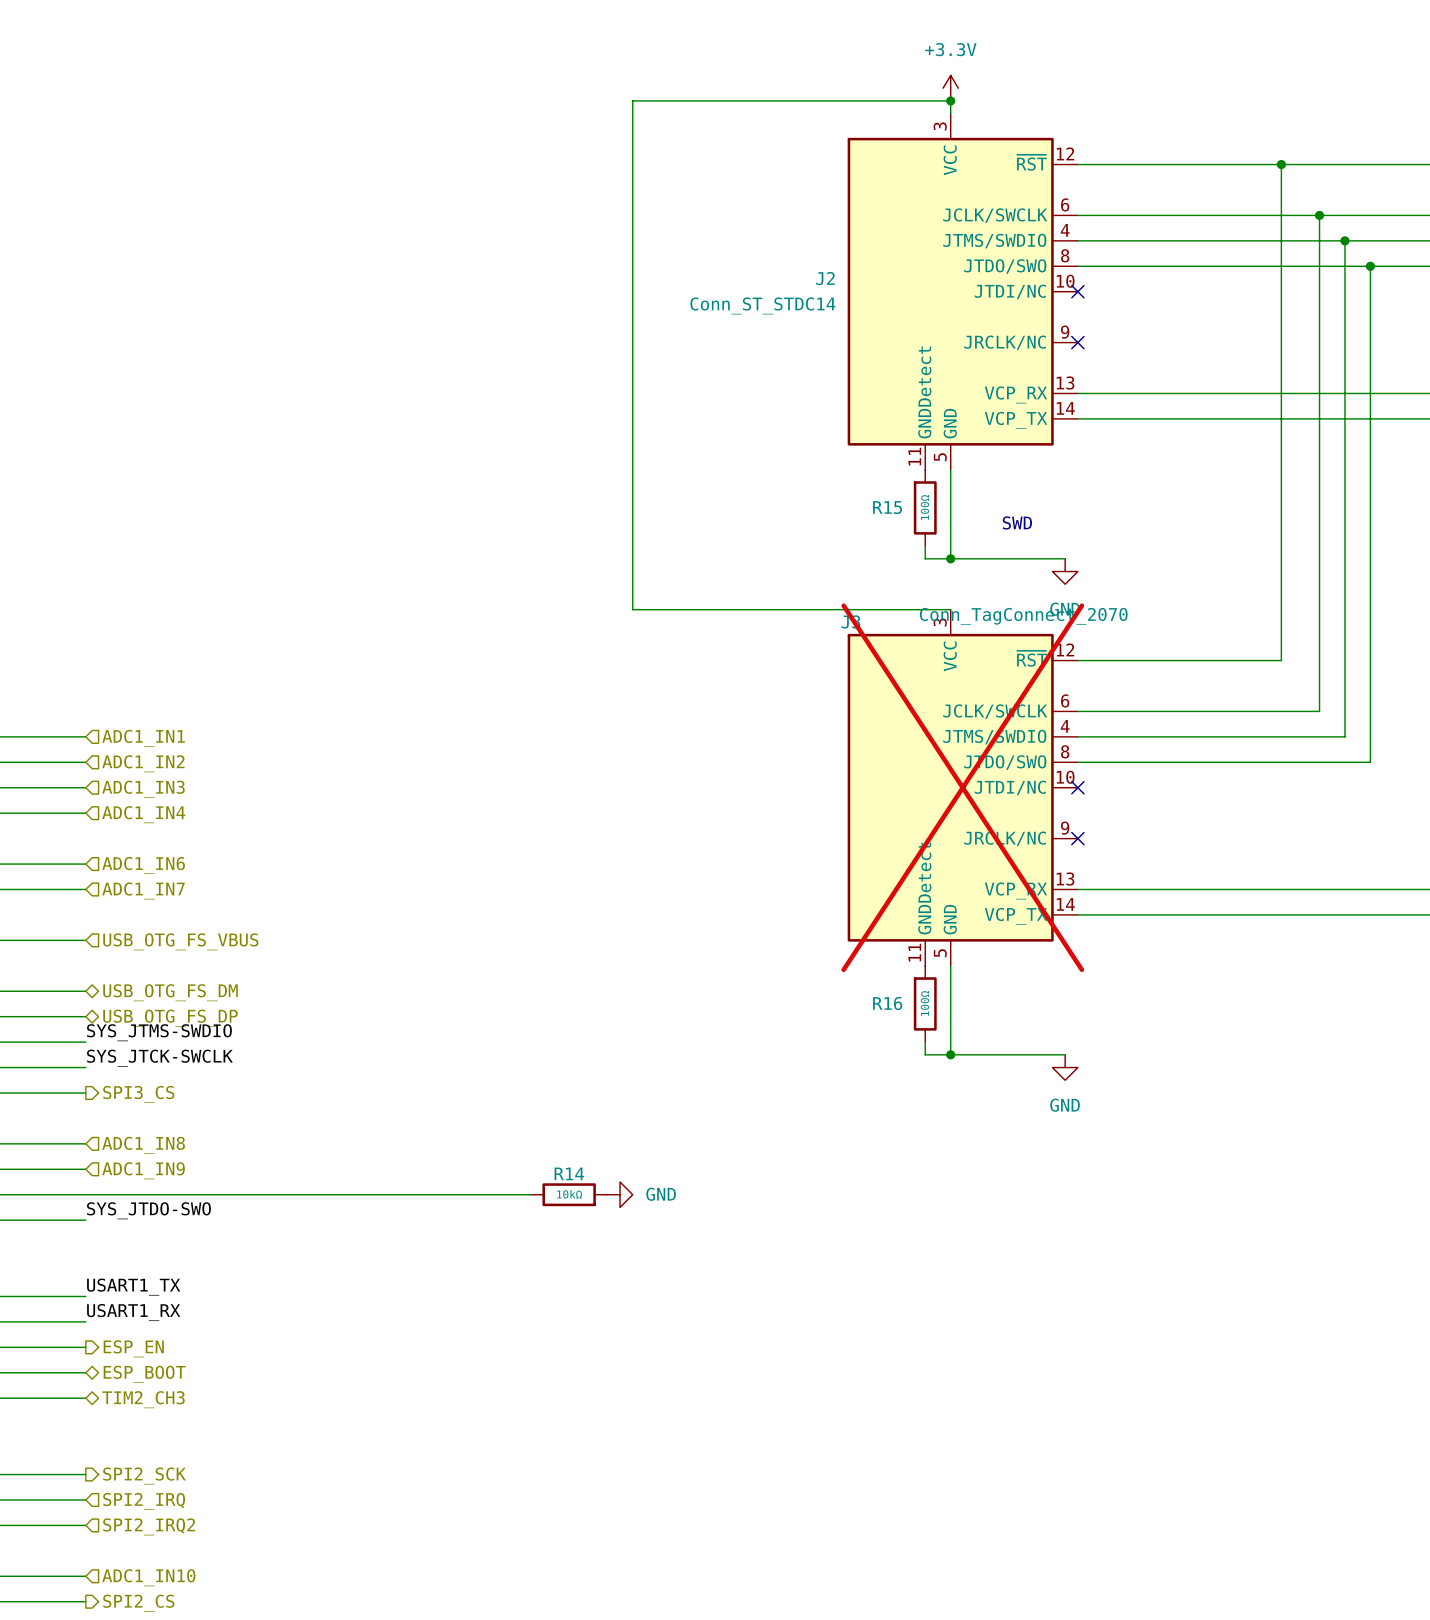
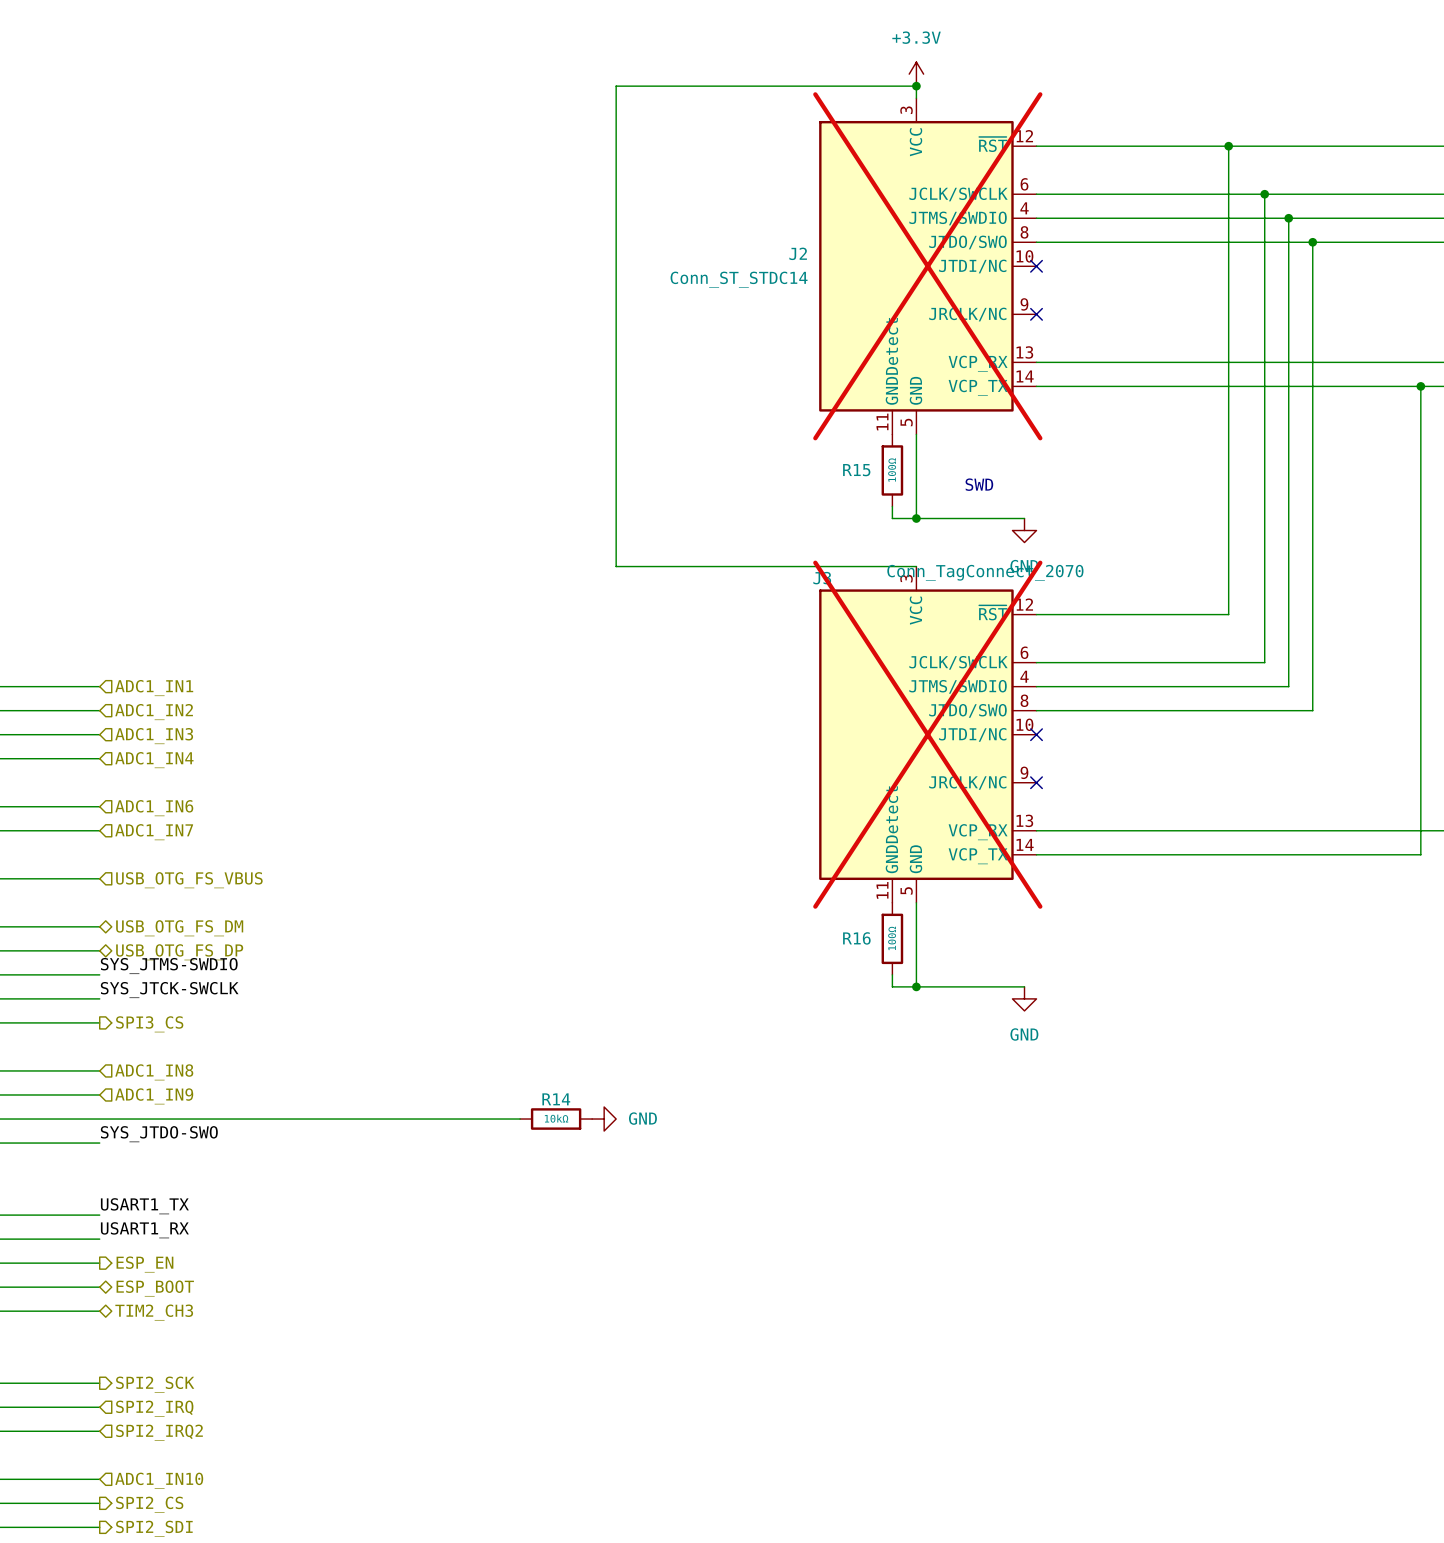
J2 do-not-place cross: none -> (927, 266)

